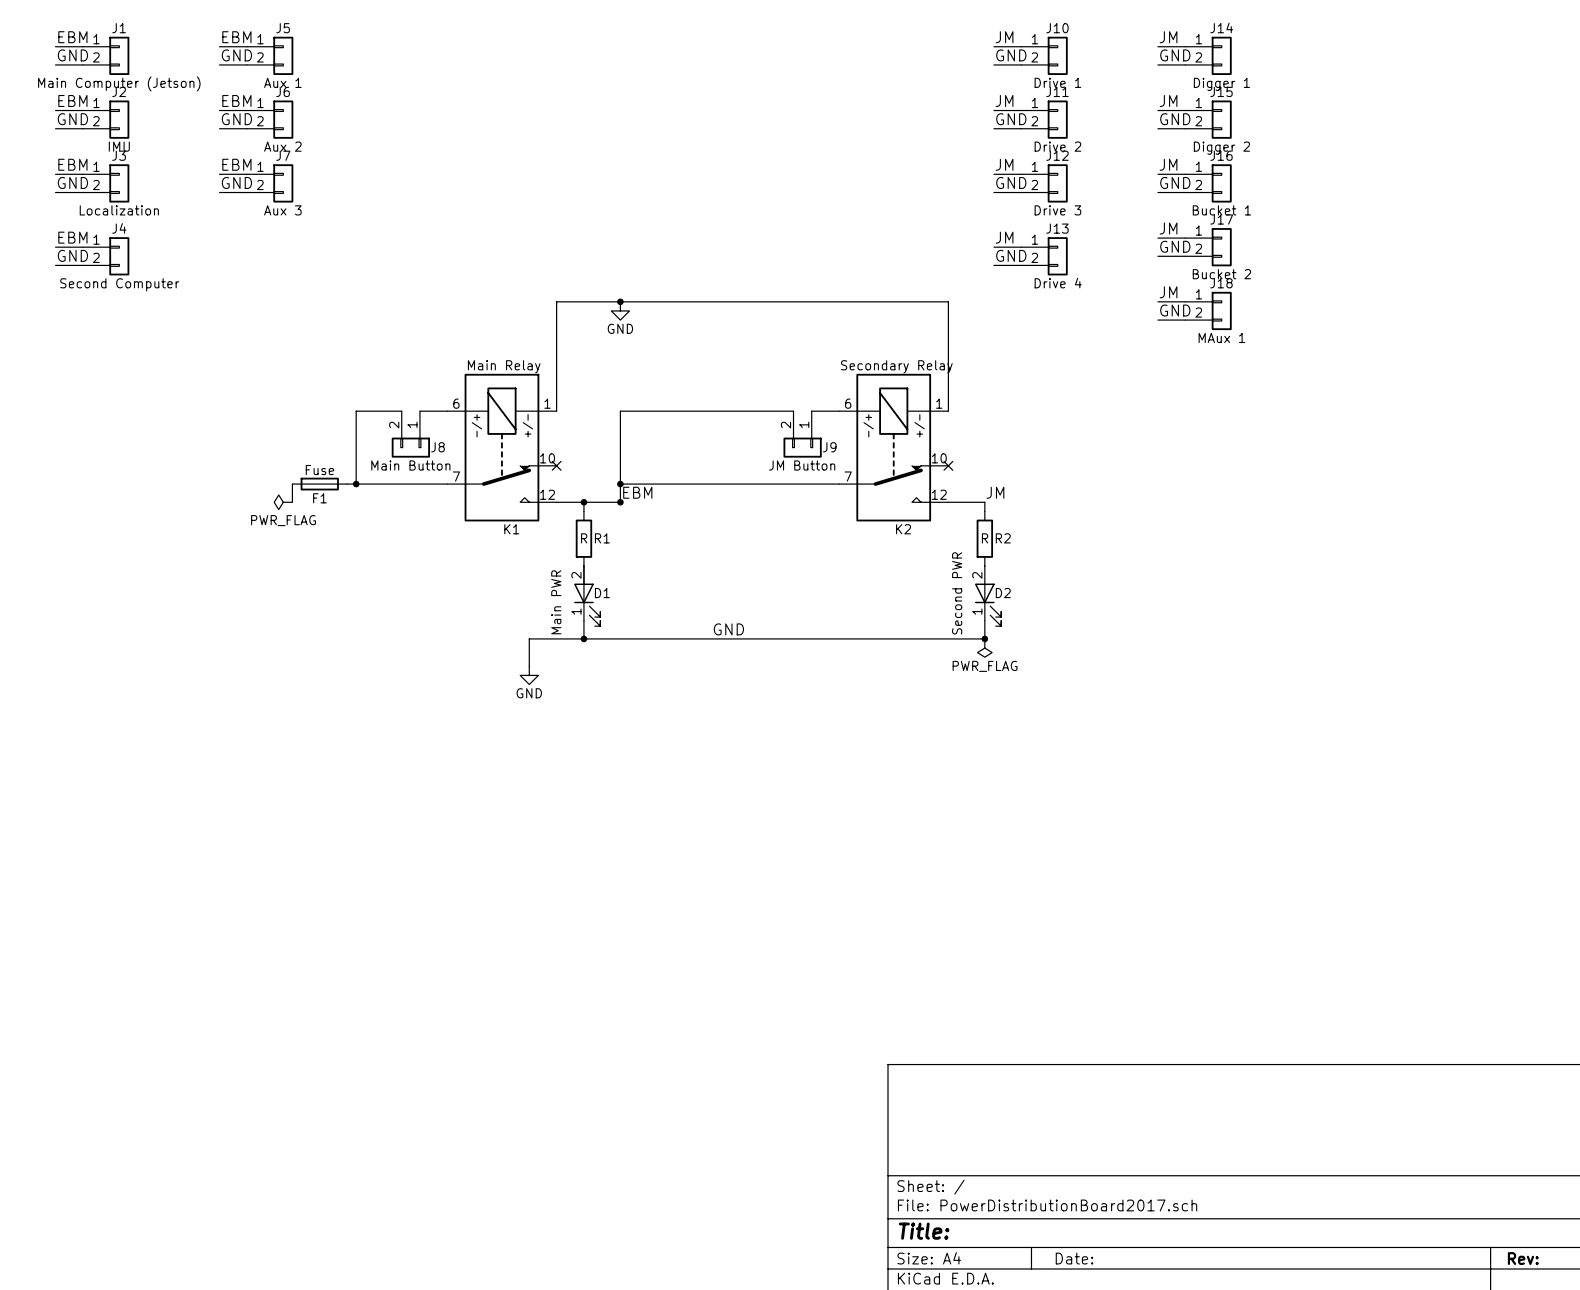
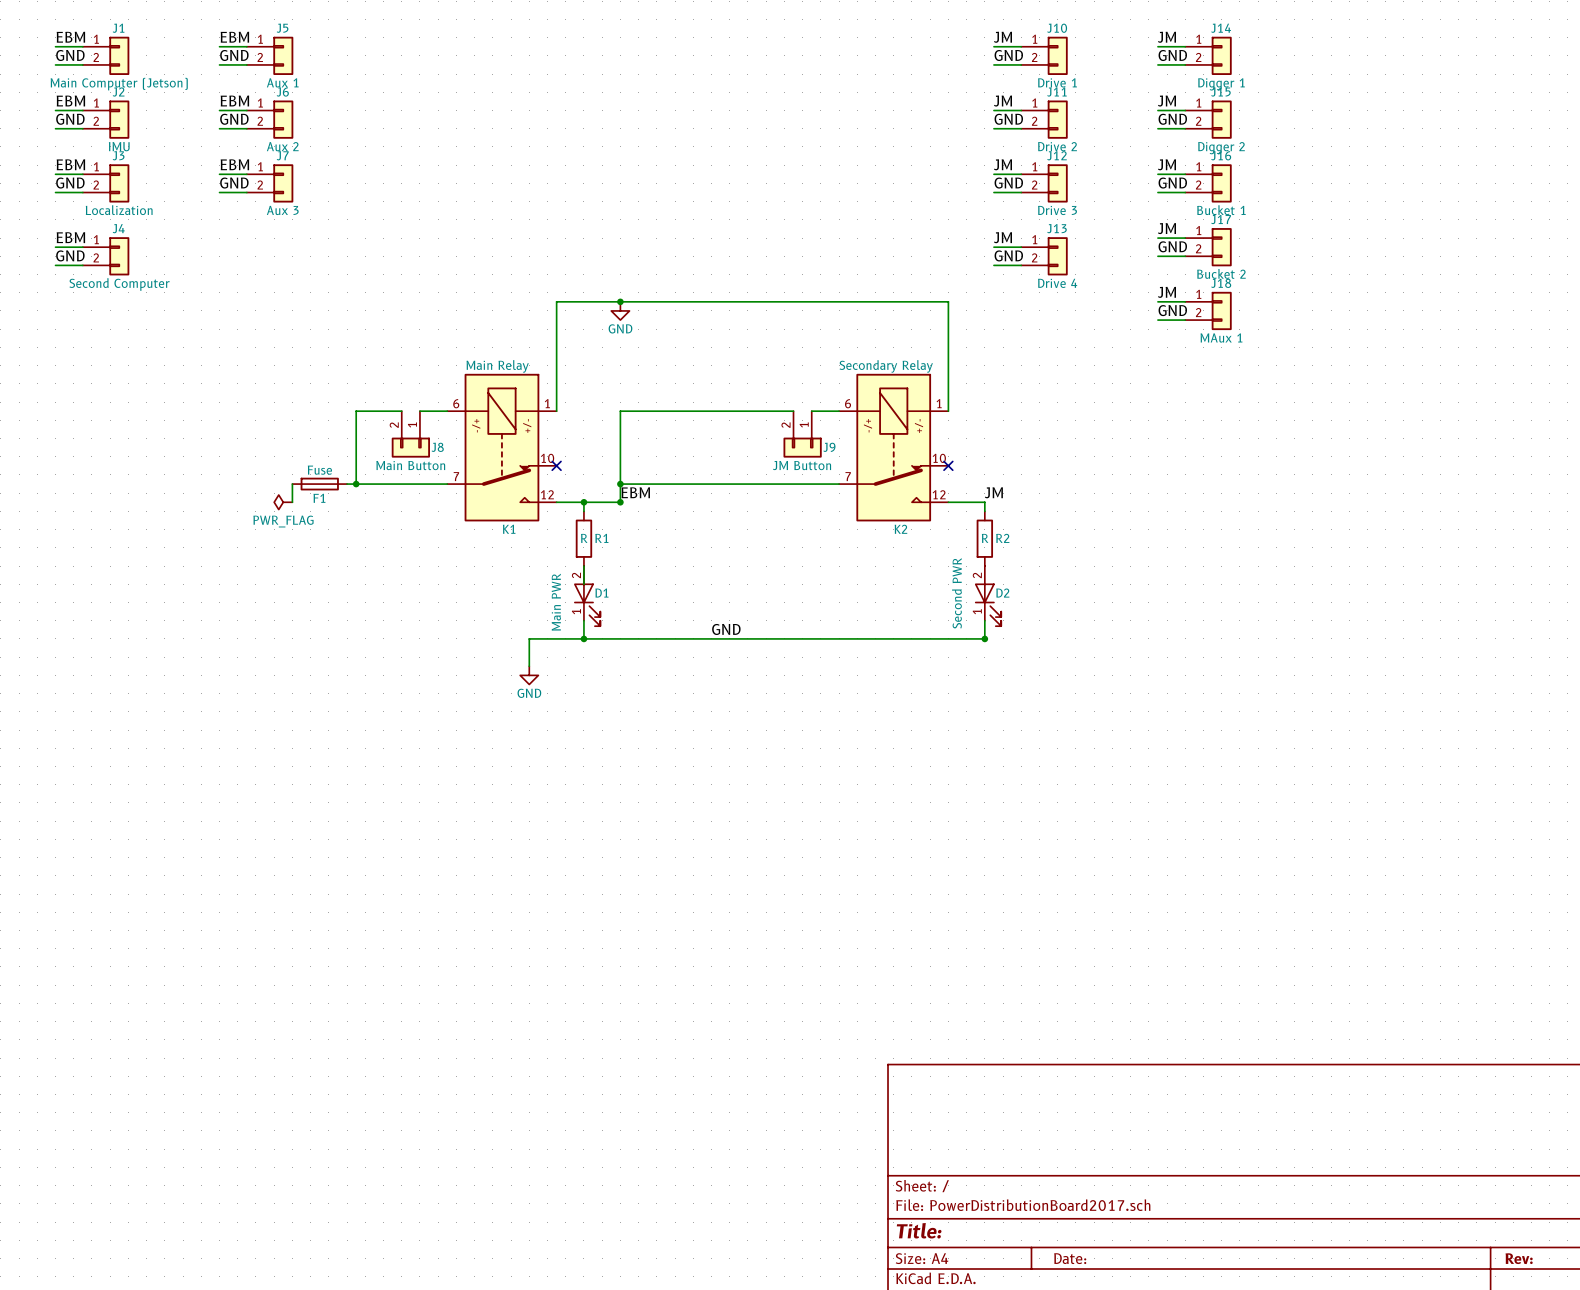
power symbol: PWR_FLAG (984, 648) -> none

